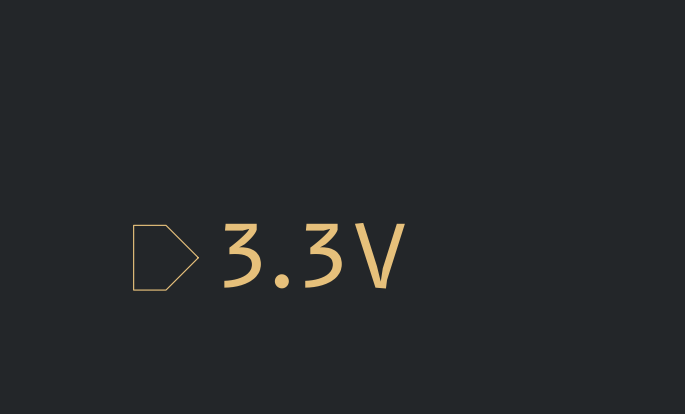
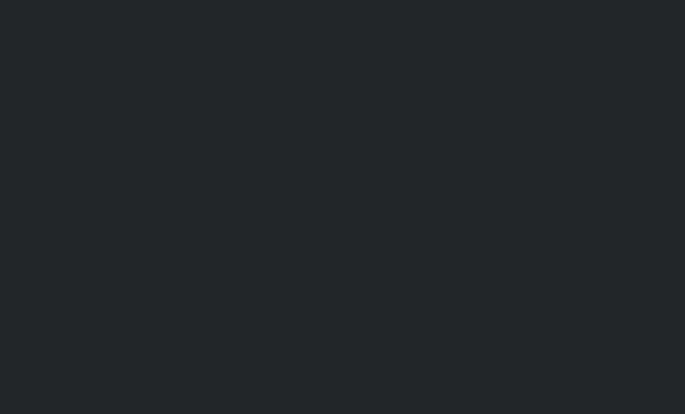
hierarchical label: 3.3V (314, 255) -> none

